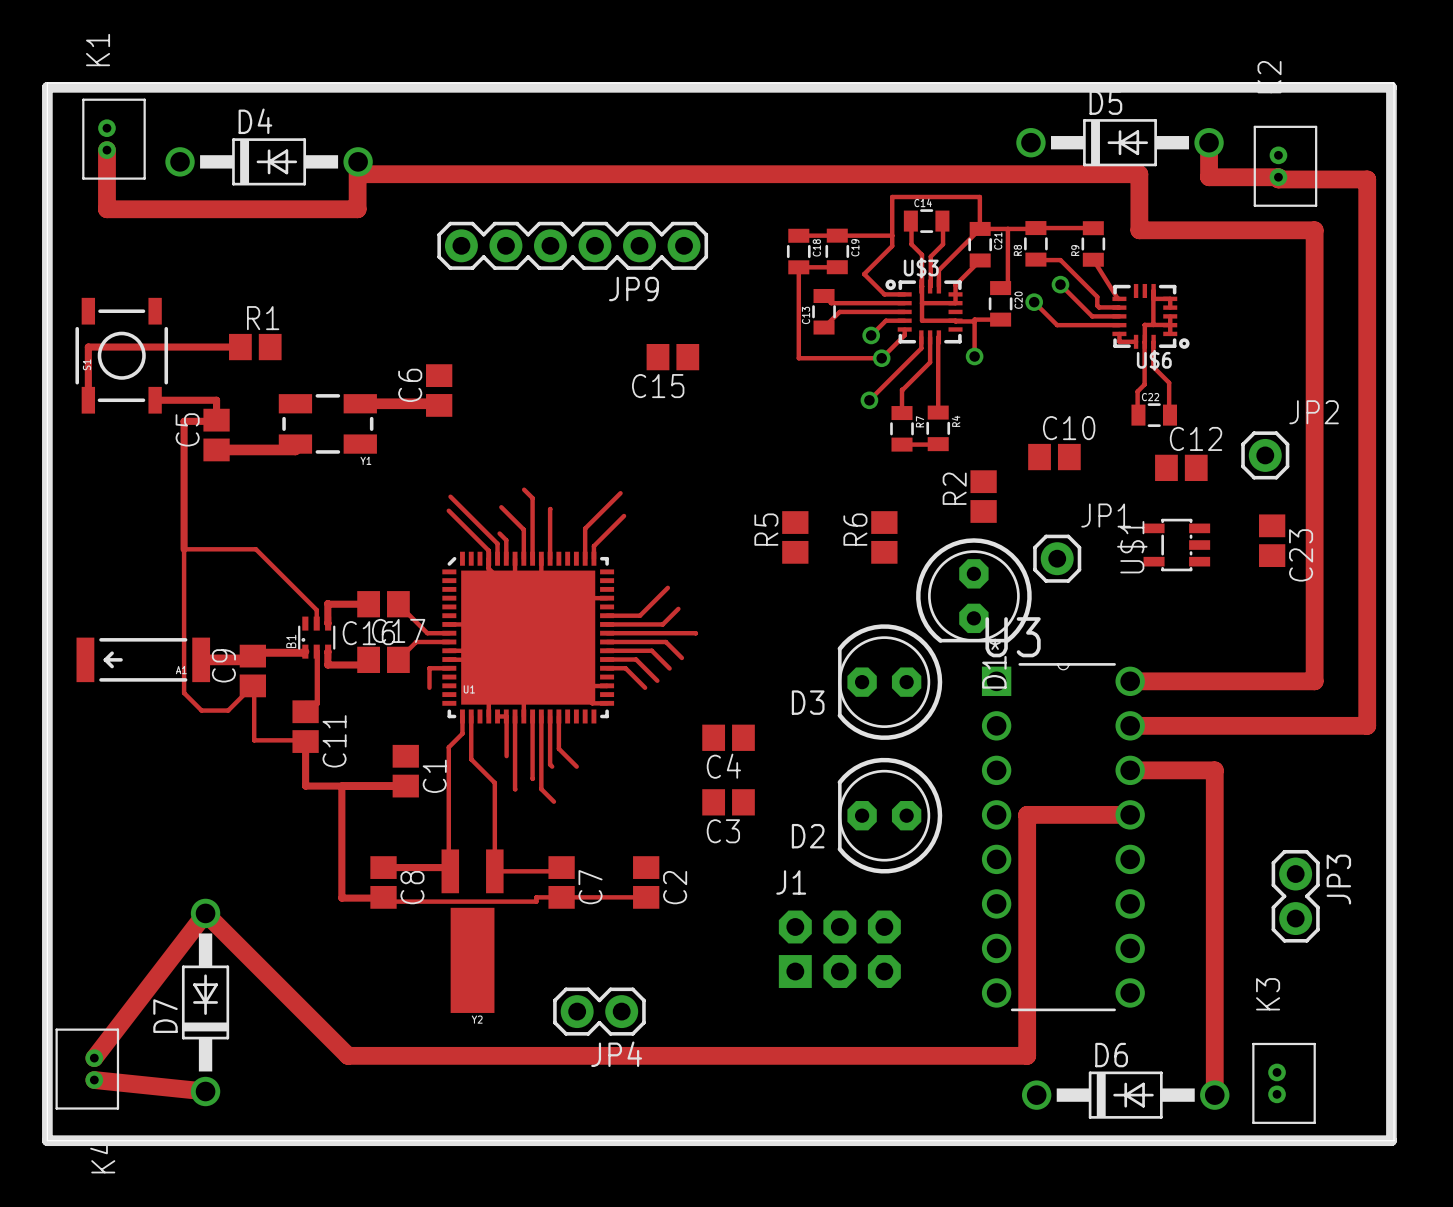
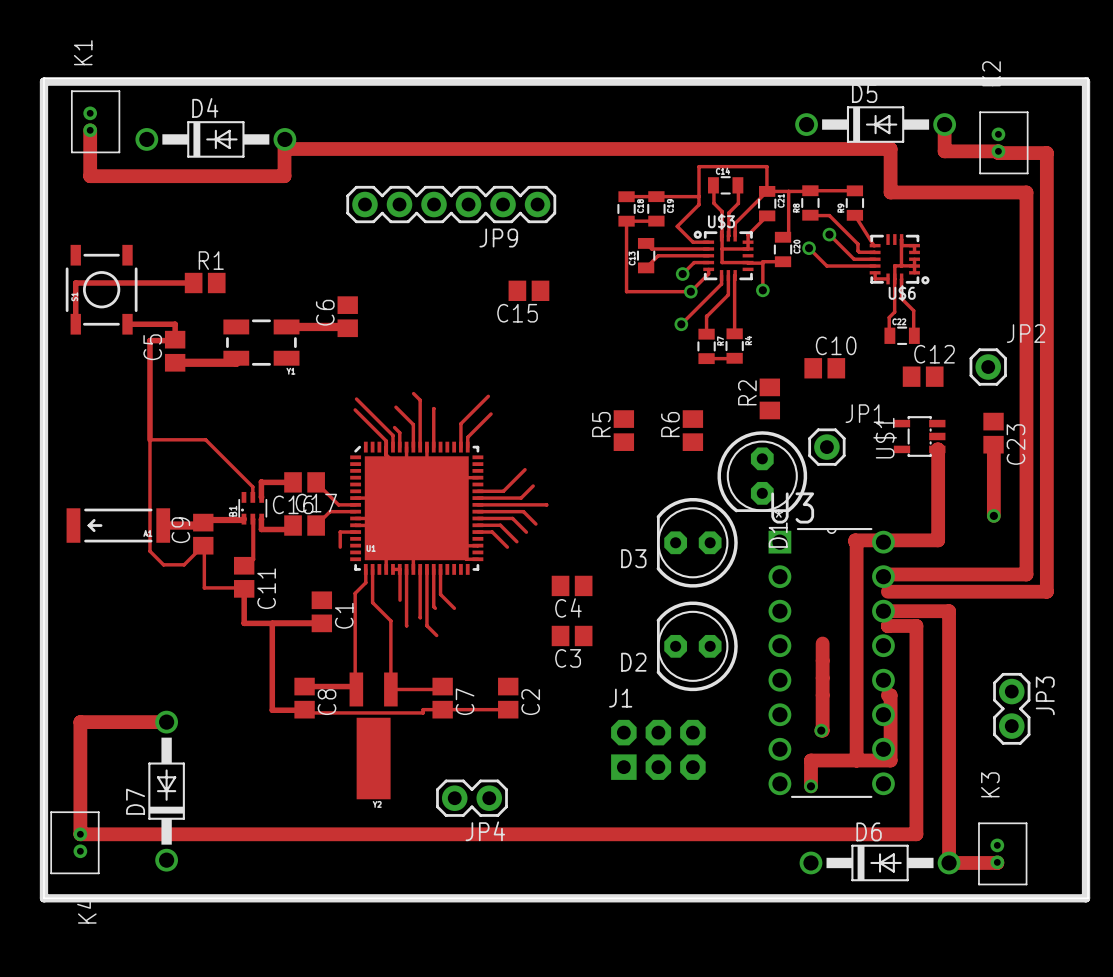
track: (1340, 179) (1367, 179) (1367, 725) (1130, 725) -> (1046, 153) (1046, 591) (887, 591)
track: none -> (993, 444) (993, 515)
track: none -> (937, 449) (938, 540) (855, 540) (856, 760)
via: none -> (993, 515)
track: (1130, 681) (1314, 681) -> (887, 574) (1026, 574) (1026, 542)
track: none -> (887, 625) (916, 625) (916, 834) (80, 834) (80, 722) (166, 722)
track: none -> (822, 643) (821, 730)
track: (1130, 814) (1027, 814) (1027, 1055) (347, 1055) (205, 913) (94, 1058) -> none
track: none -> (887, 695) (890, 695) (890, 760) (810, 760) (810, 786)
via: none -> (821, 730)
via: none -> (810, 786)
track: (94, 1080) (205, 1091) -> none
track: none -> (997, 862) (949, 862)

